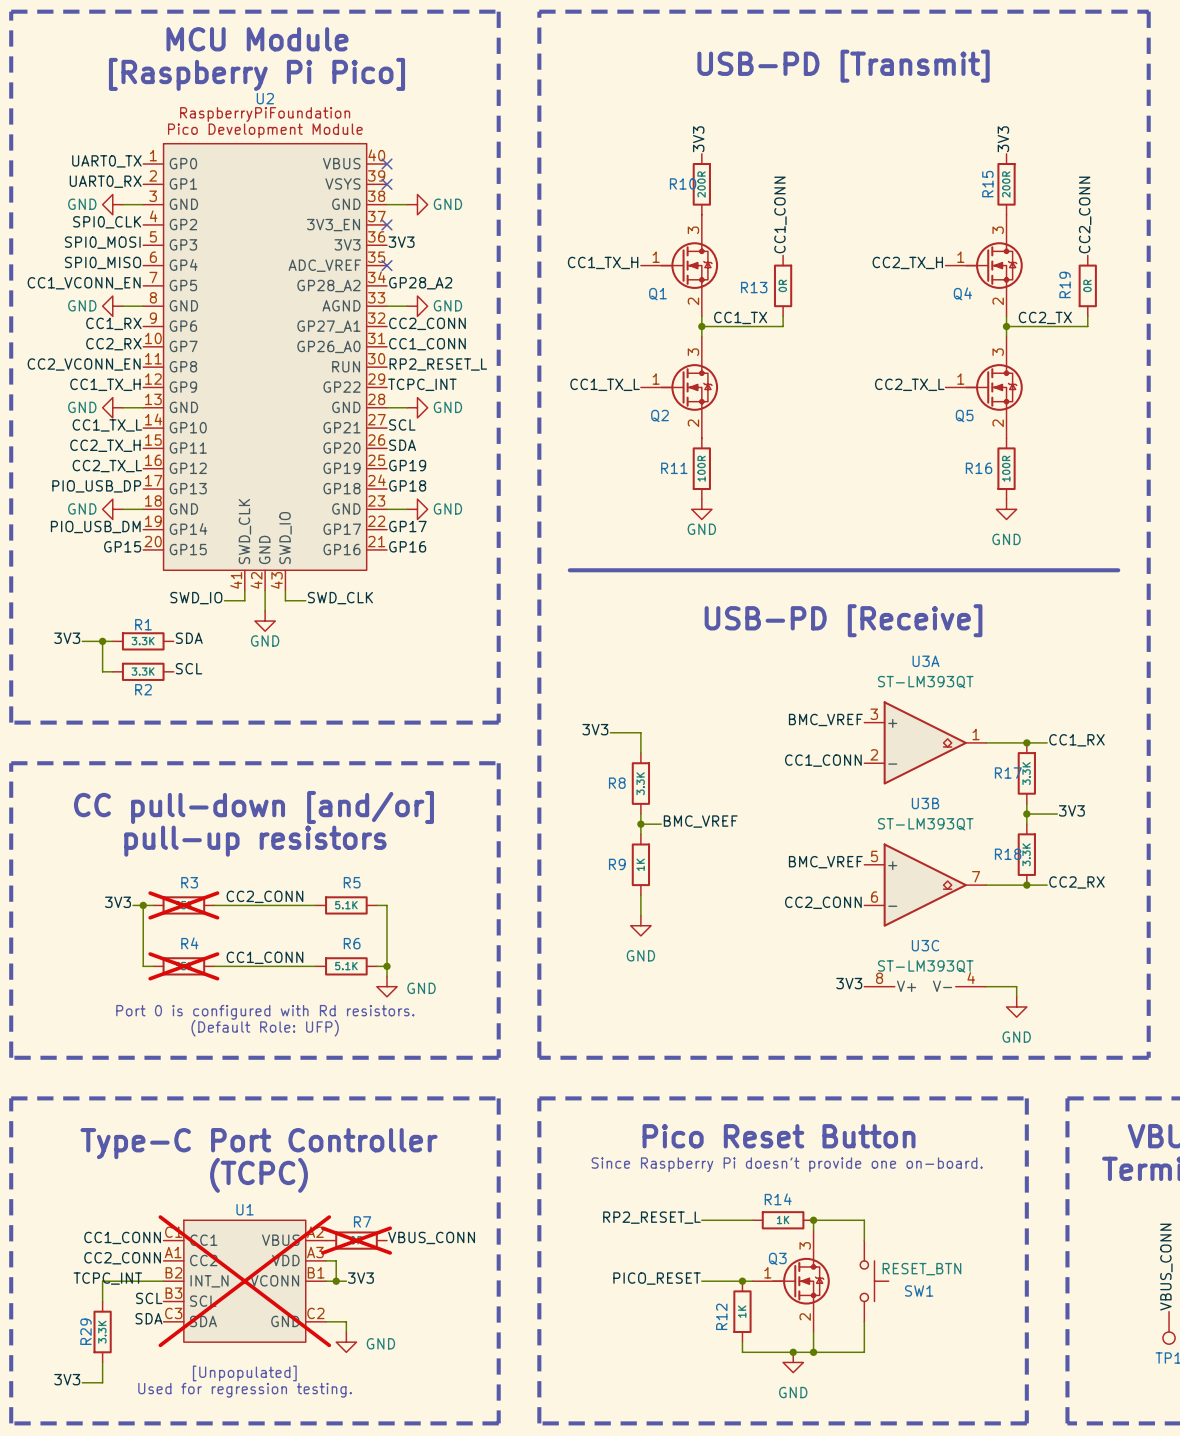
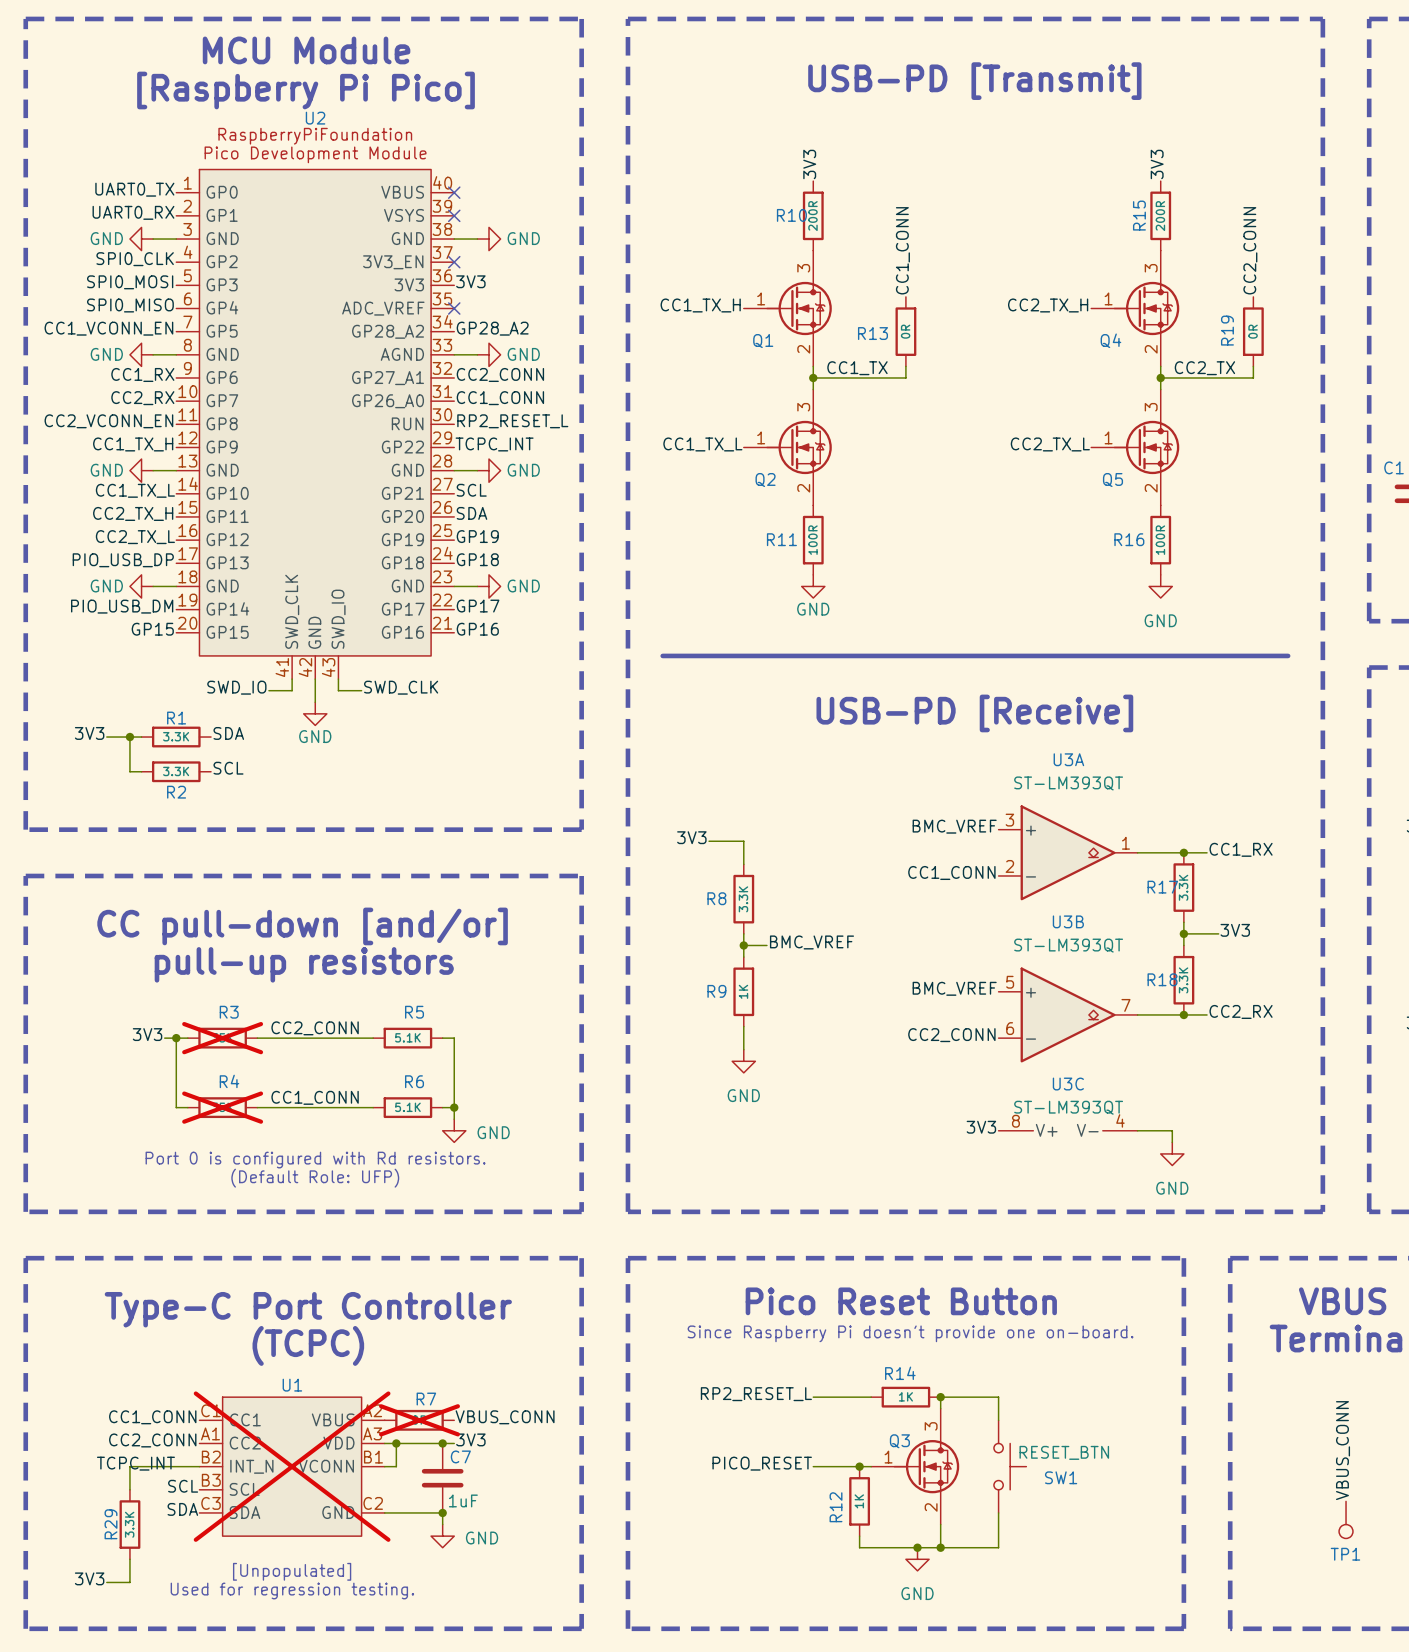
wire: none -> (396, 1443) (454, 1443)
junction: none -> (442, 1443)
label position: 3V3 (360, 1278) -> 3V3 (470, 1439)
wire: (336, 1281) (346, 1281) -> none
junction position: (336, 1281) -> (396, 1443)
C7: none -> 1uF (442, 1478)
wire: (346, 1321) (346, 1331) -> (407, 1512) (442, 1512) (442, 1524)
junction: none -> (442, 1512)
power symbol position: GND (346, 1342) -> GND (442, 1536)

